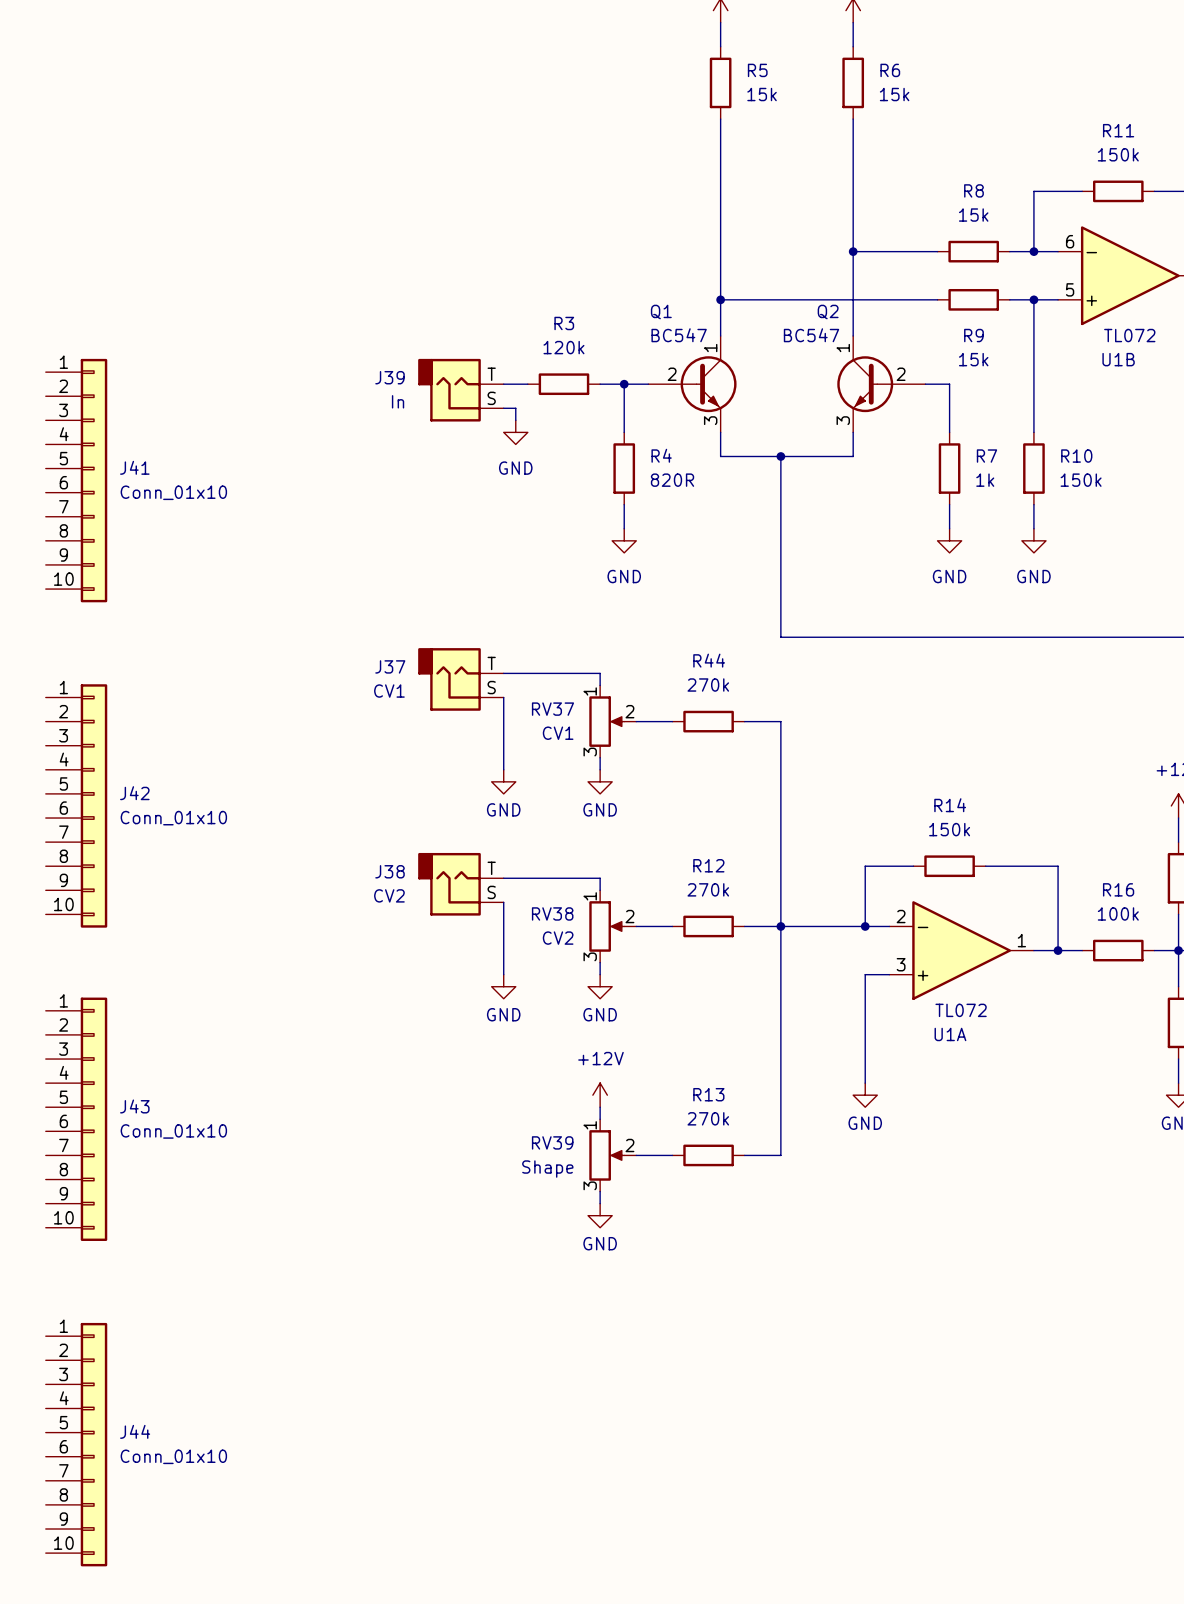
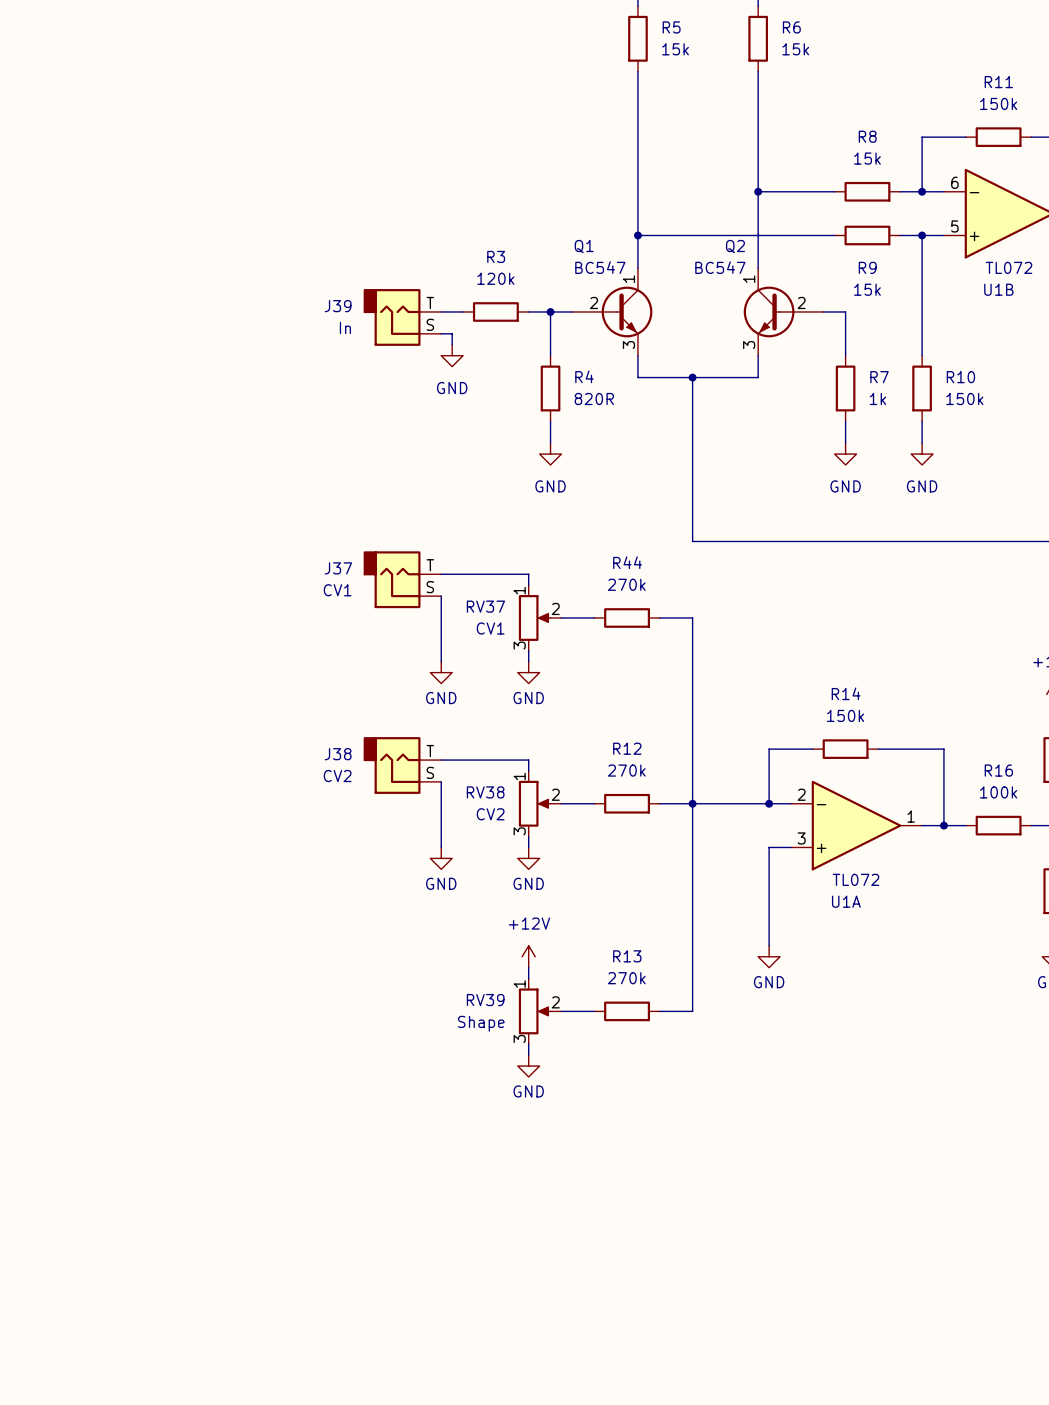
J41: Conn_01x10 (76, 480) -> none
J42: Conn_01x10 (76, 805) -> none
J43: Conn_01x10 (76, 1119) -> none
J44: Conn_01x10 (76, 1444) -> none

